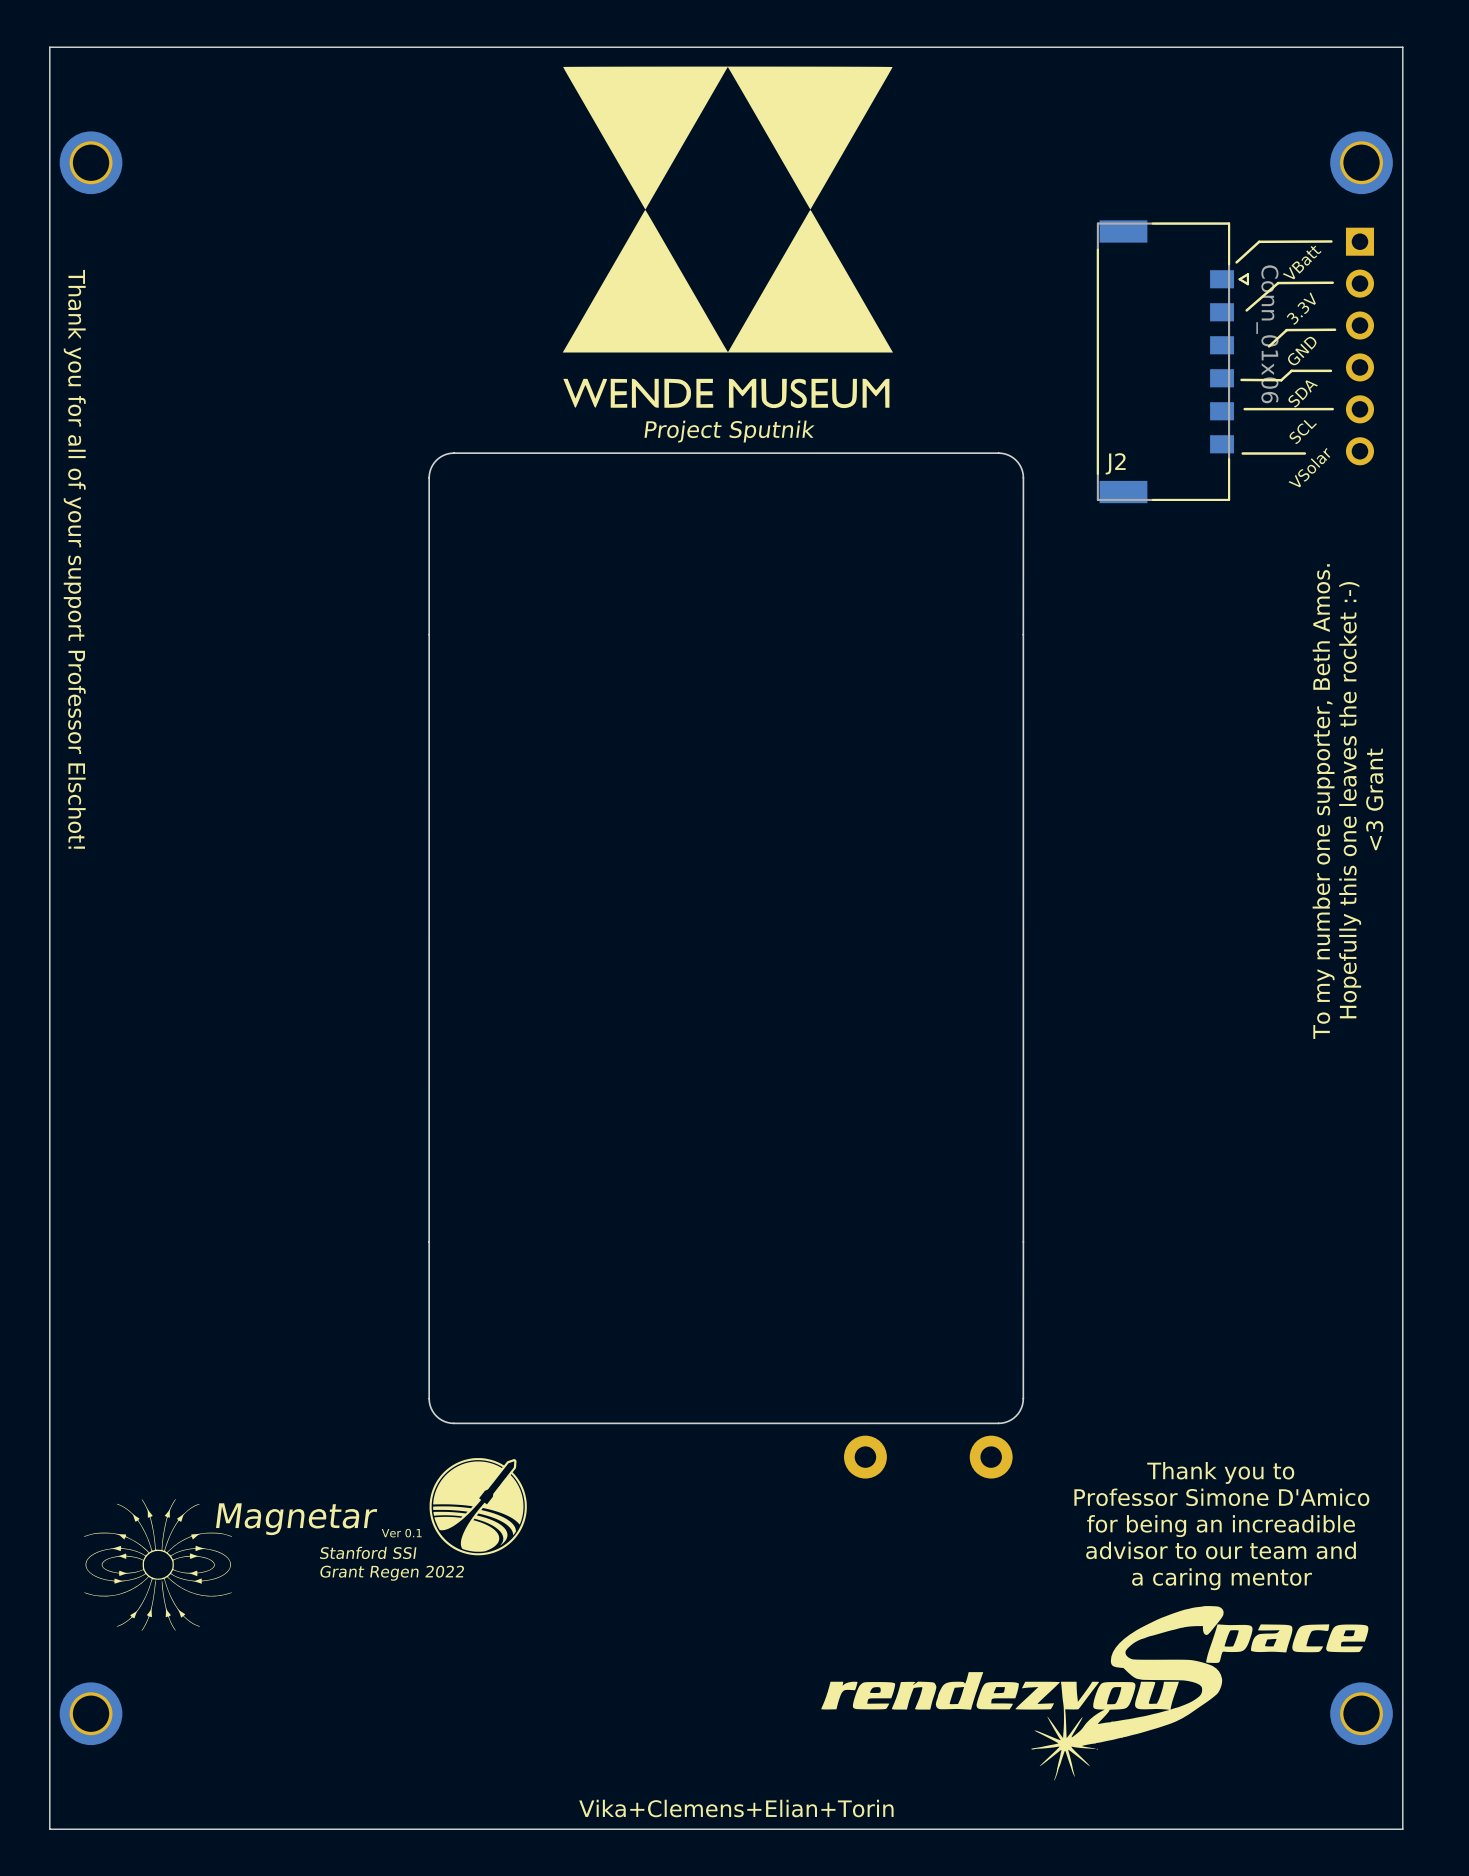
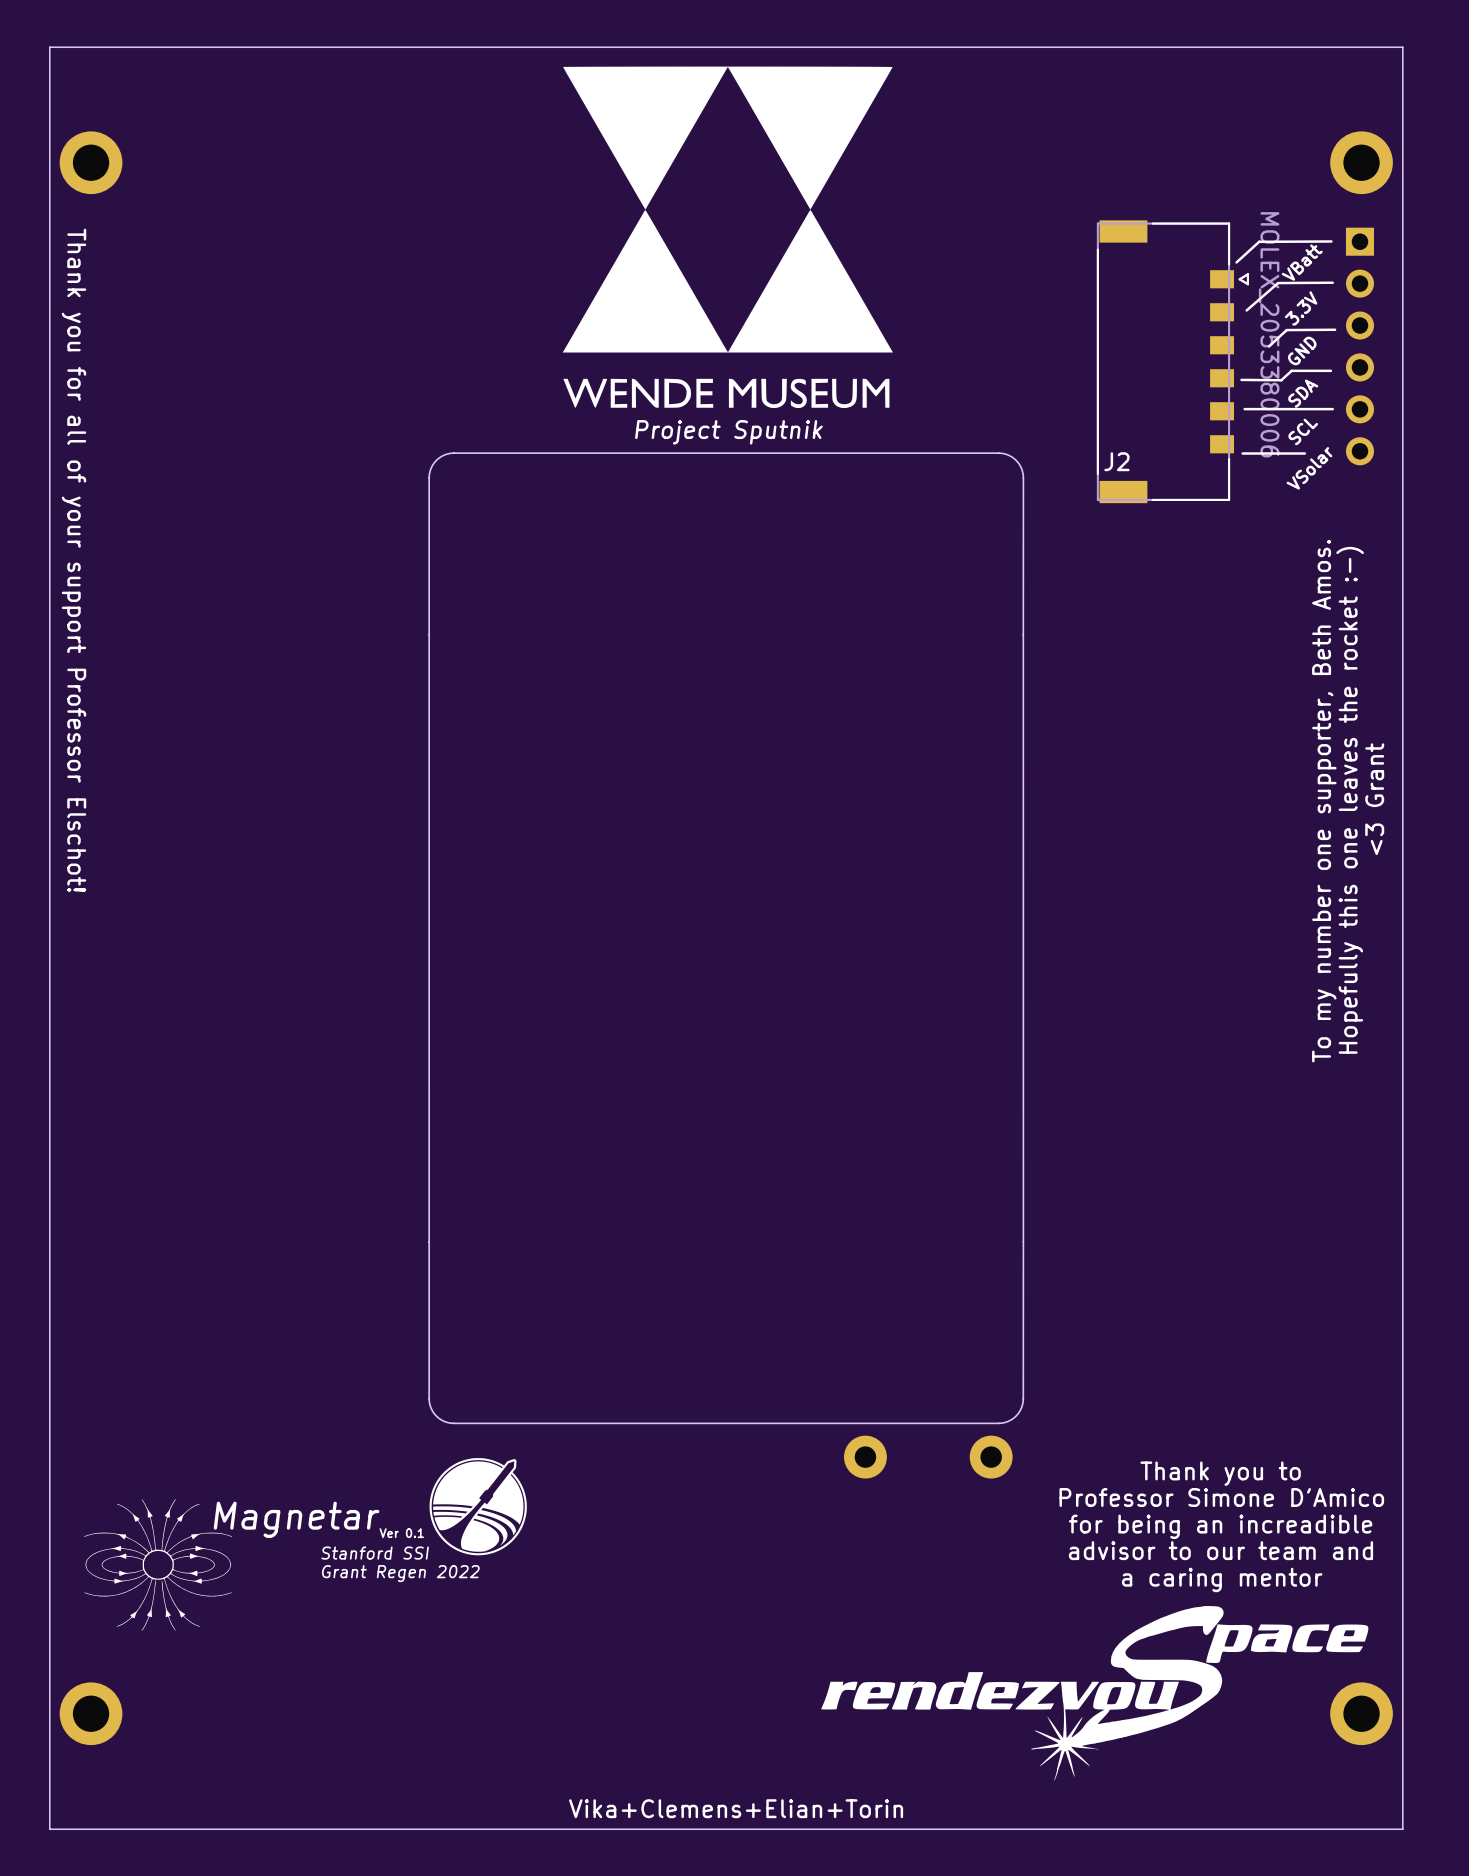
J2 value: Conn_01x06 (1267, 334) -> MOLEX_2053380006 (1269, 334)

